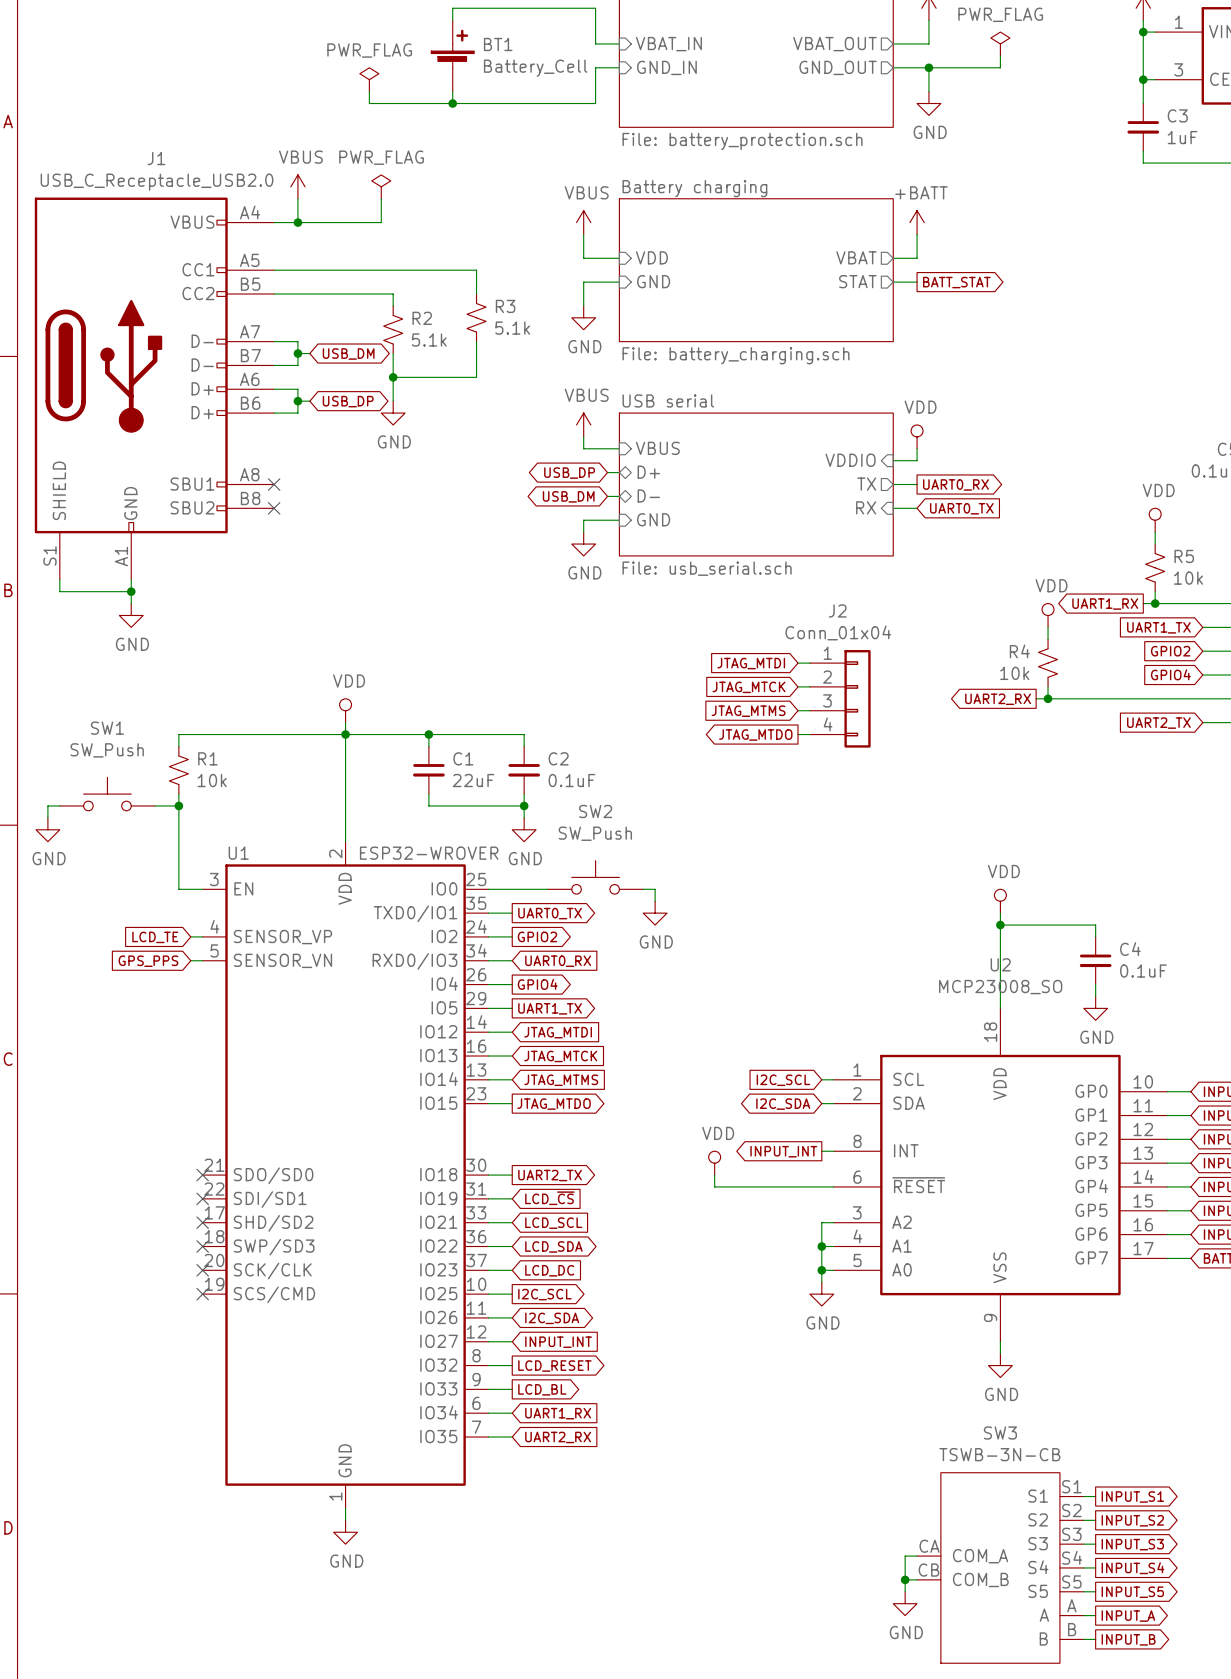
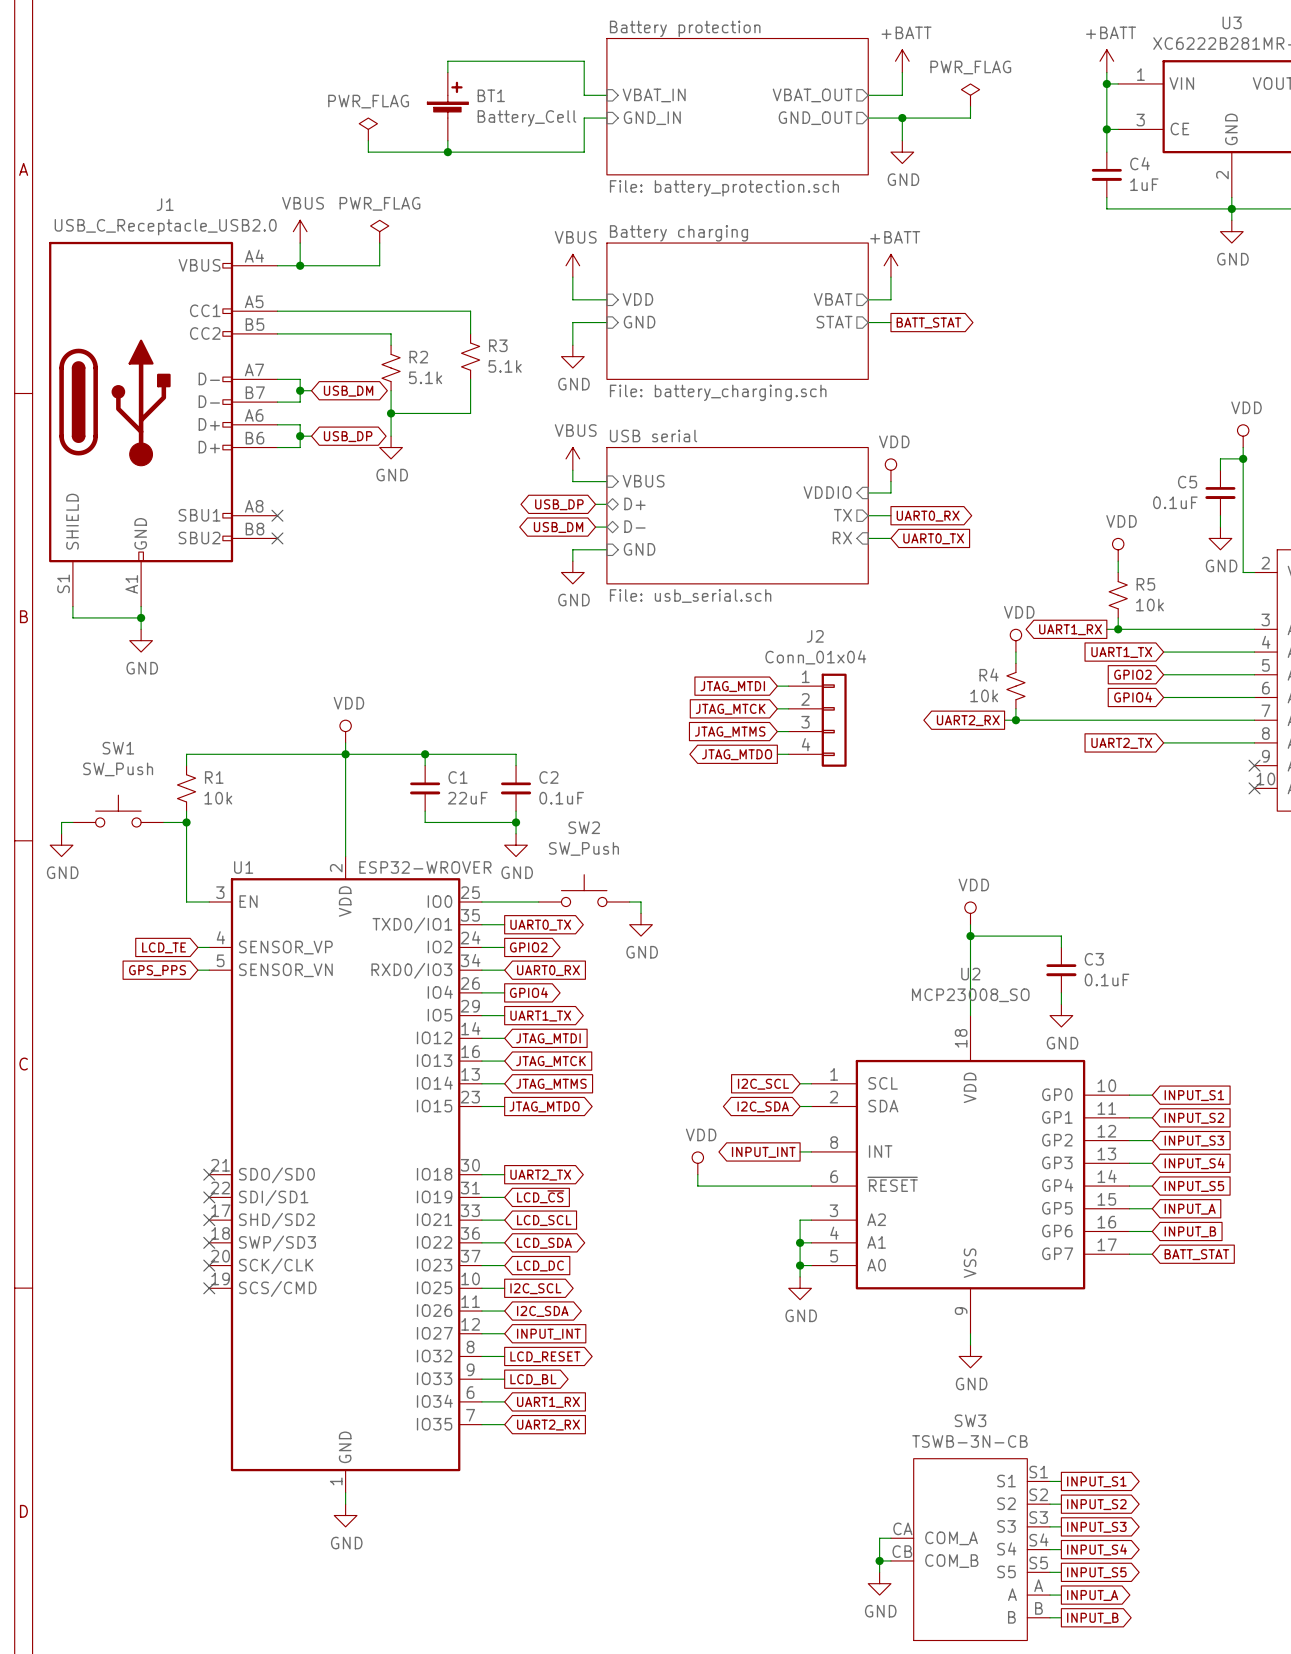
C3 name: C3 (1177, 115) -> C4 (1140, 163)
C4 name: C4 (1130, 949) -> C3 (1094, 959)

